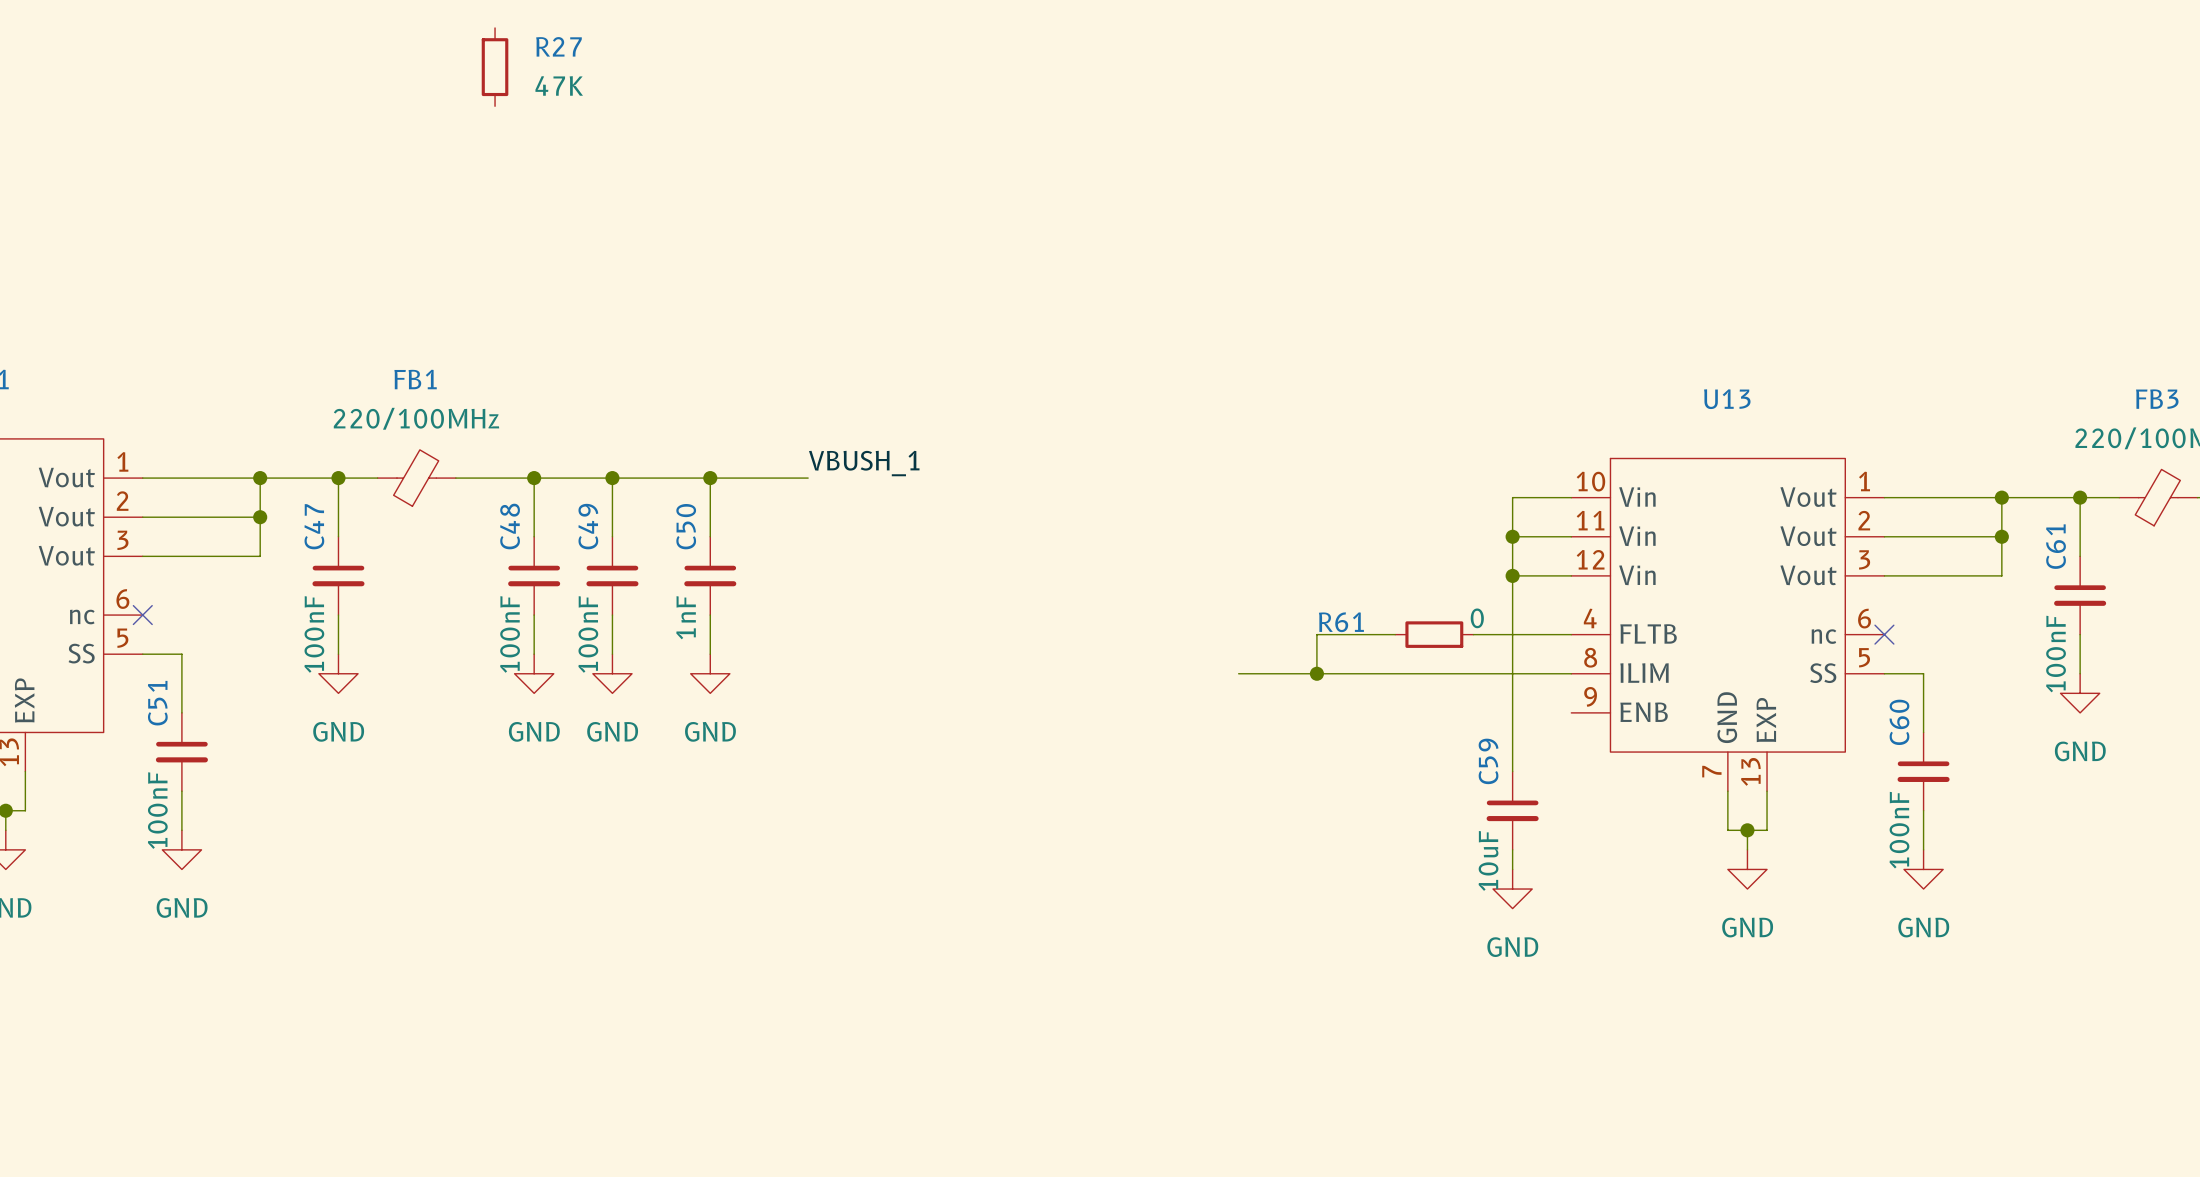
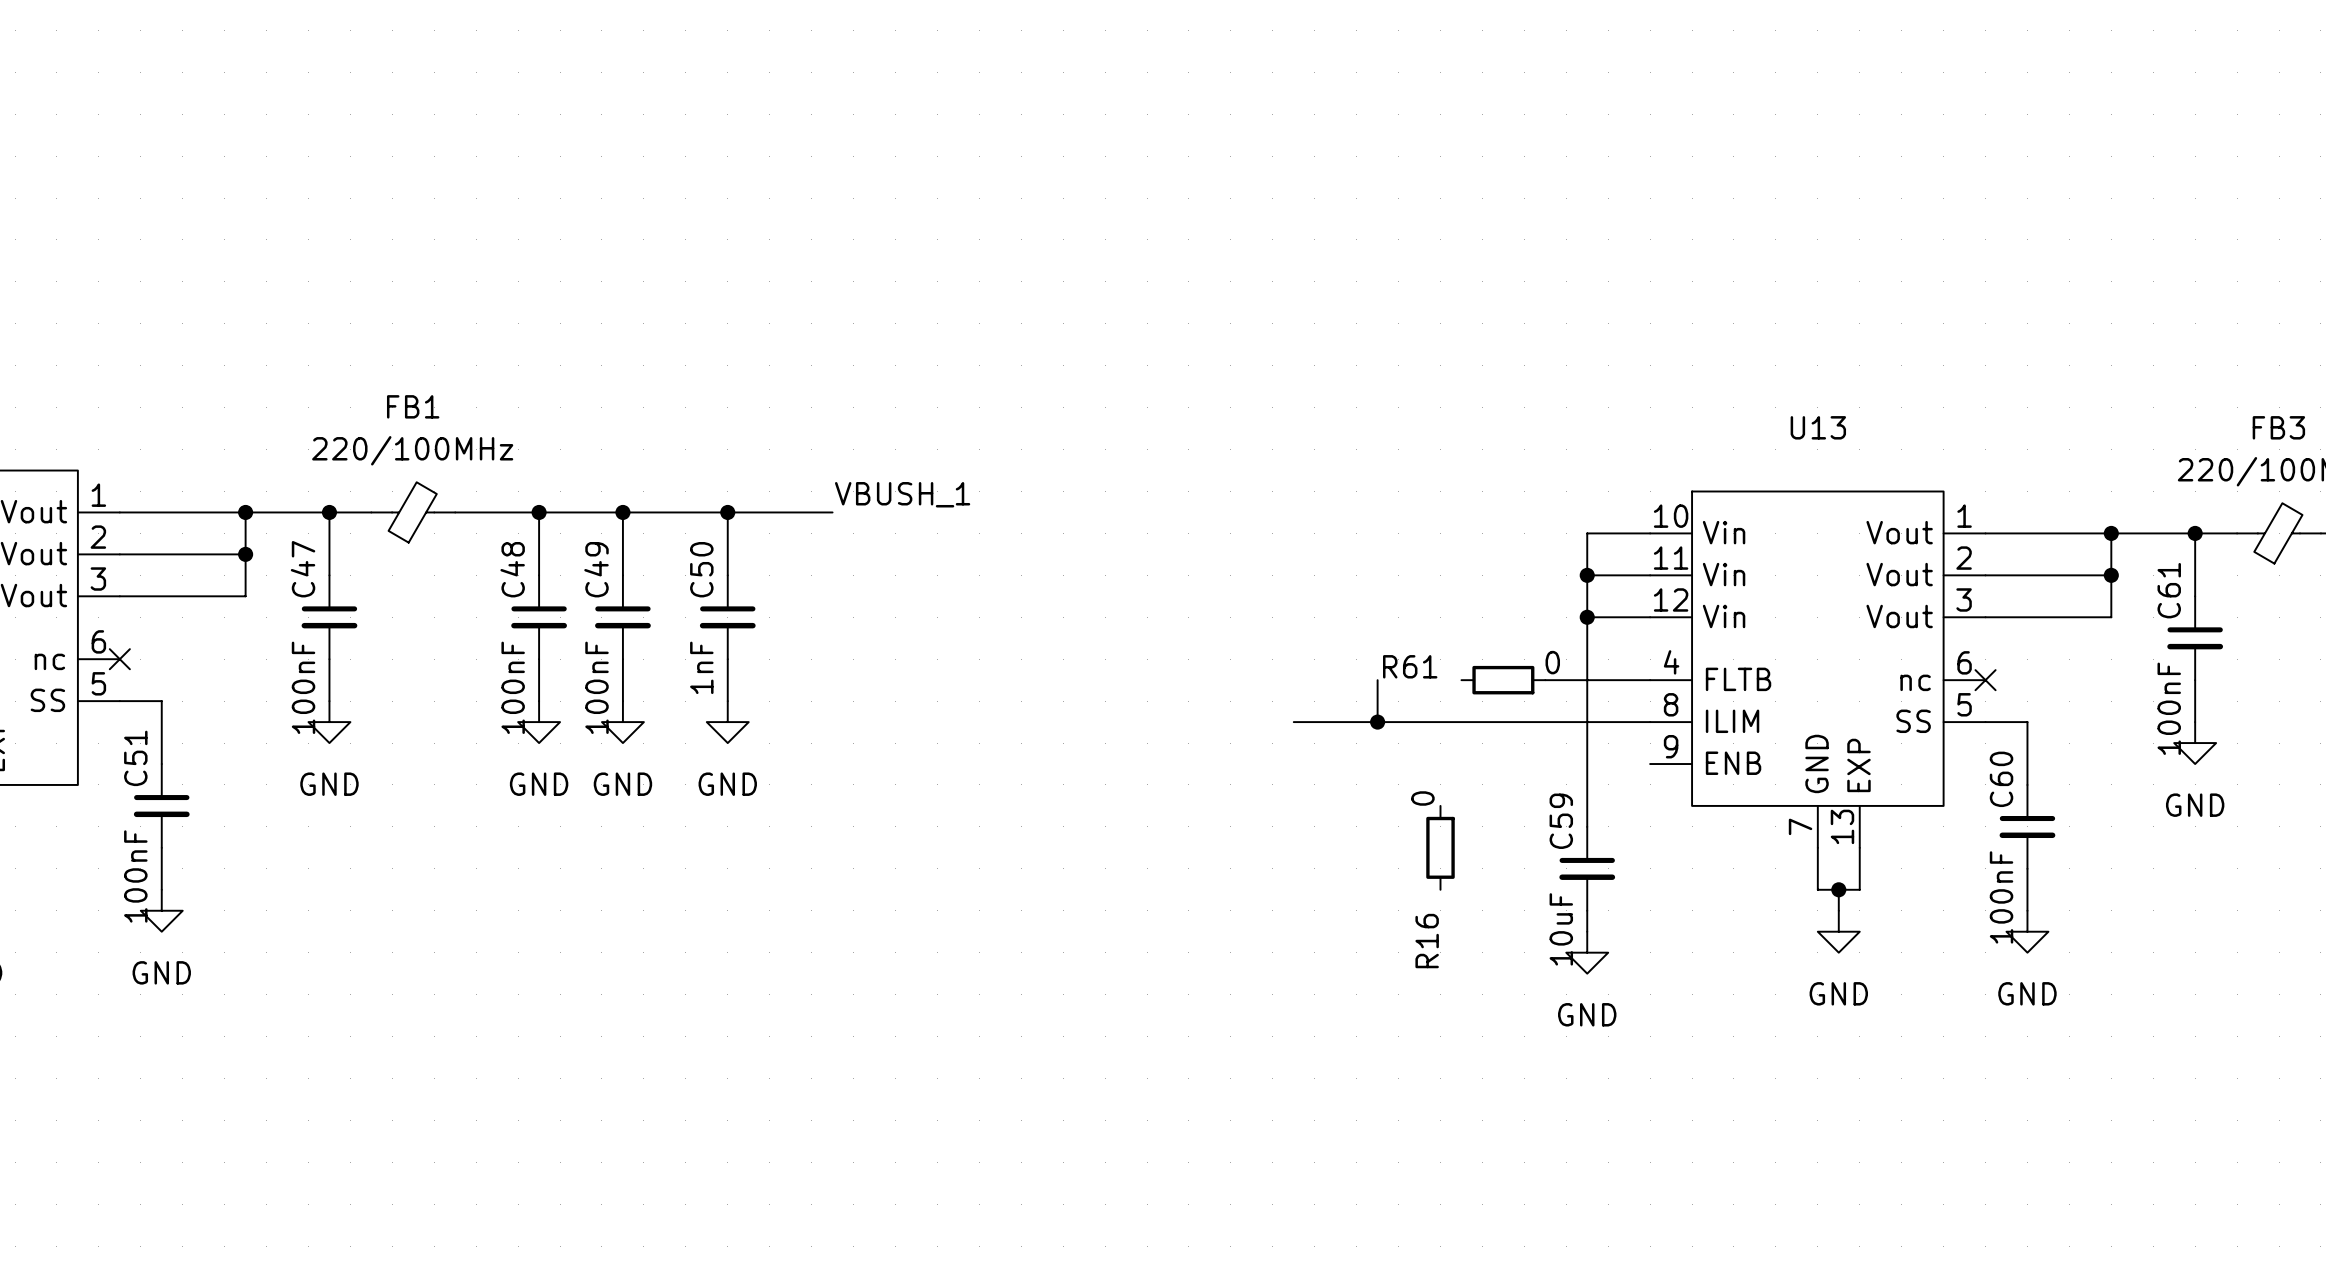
R27: 47K (495, 67) -> none
wire: (1316, 634) (1395, 634) -> none
R16: none -> 0 (1440, 847)

